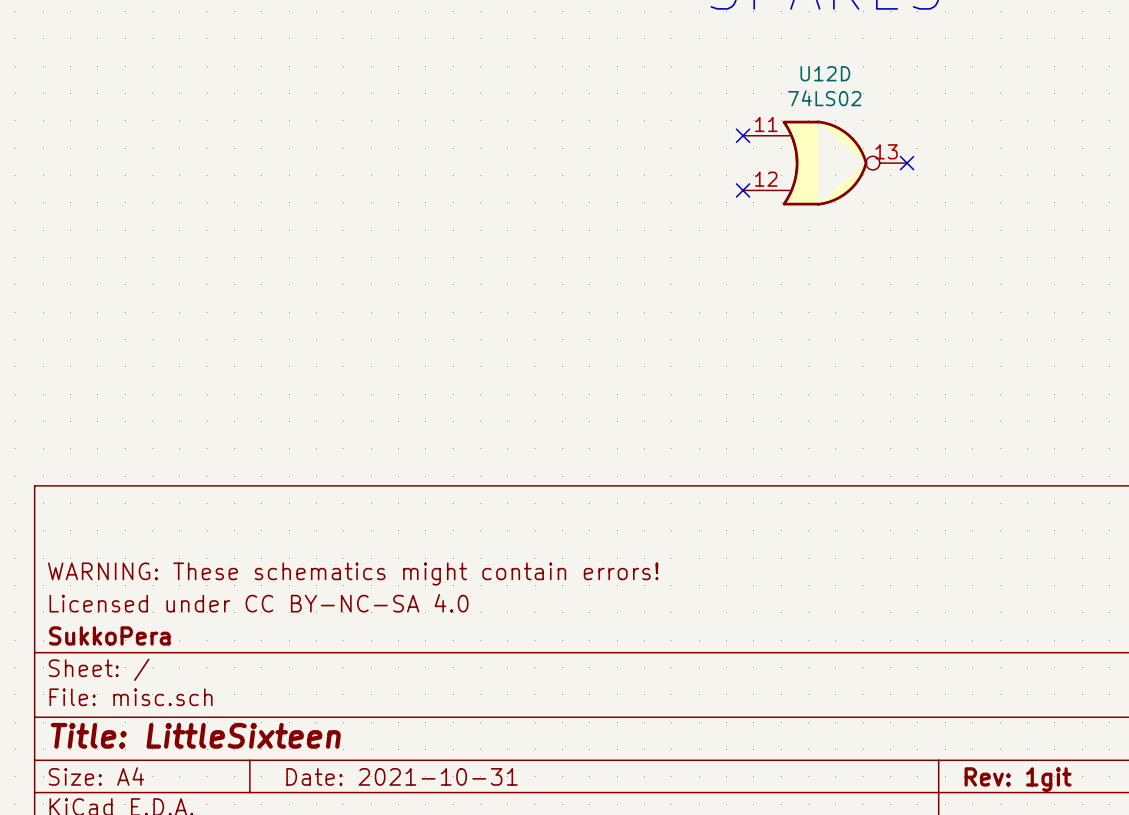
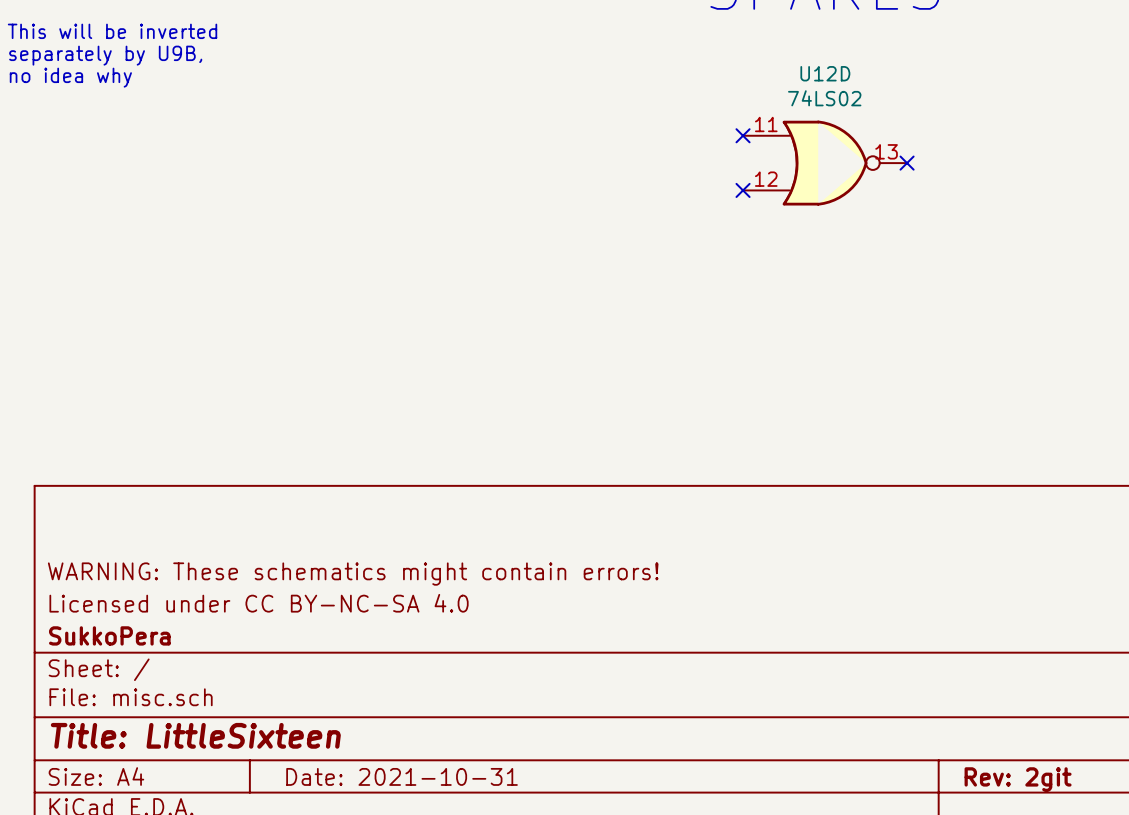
text: none -> This will be inverted (112, 31)
text: none -> separately by U9B, (105, 55)
text: none -> no idea why (70, 77)
title block: Rev: 1git (1018, 779) -> Rev: 2git (1018, 779)

